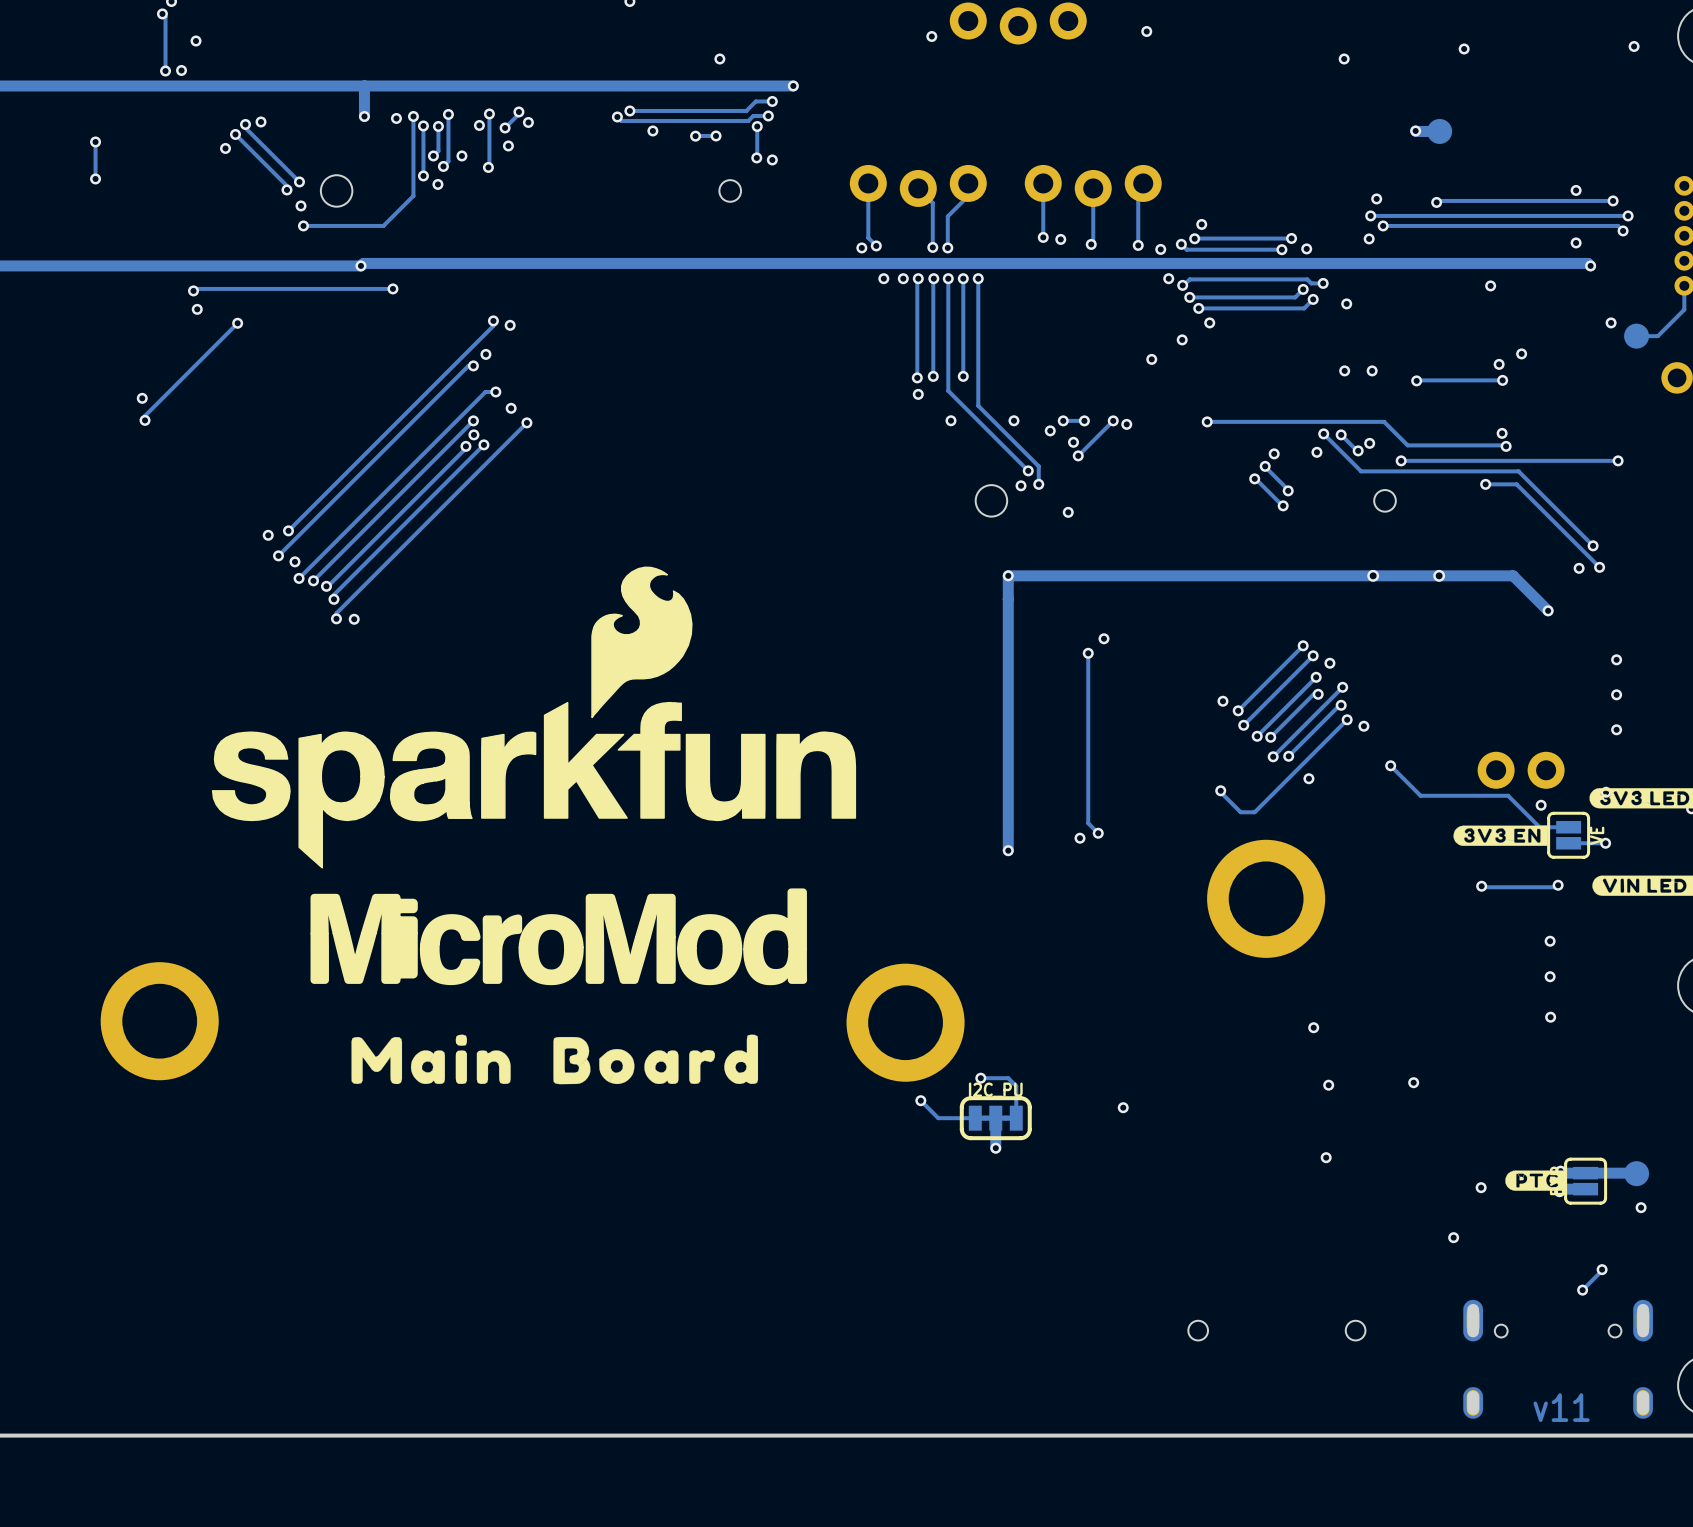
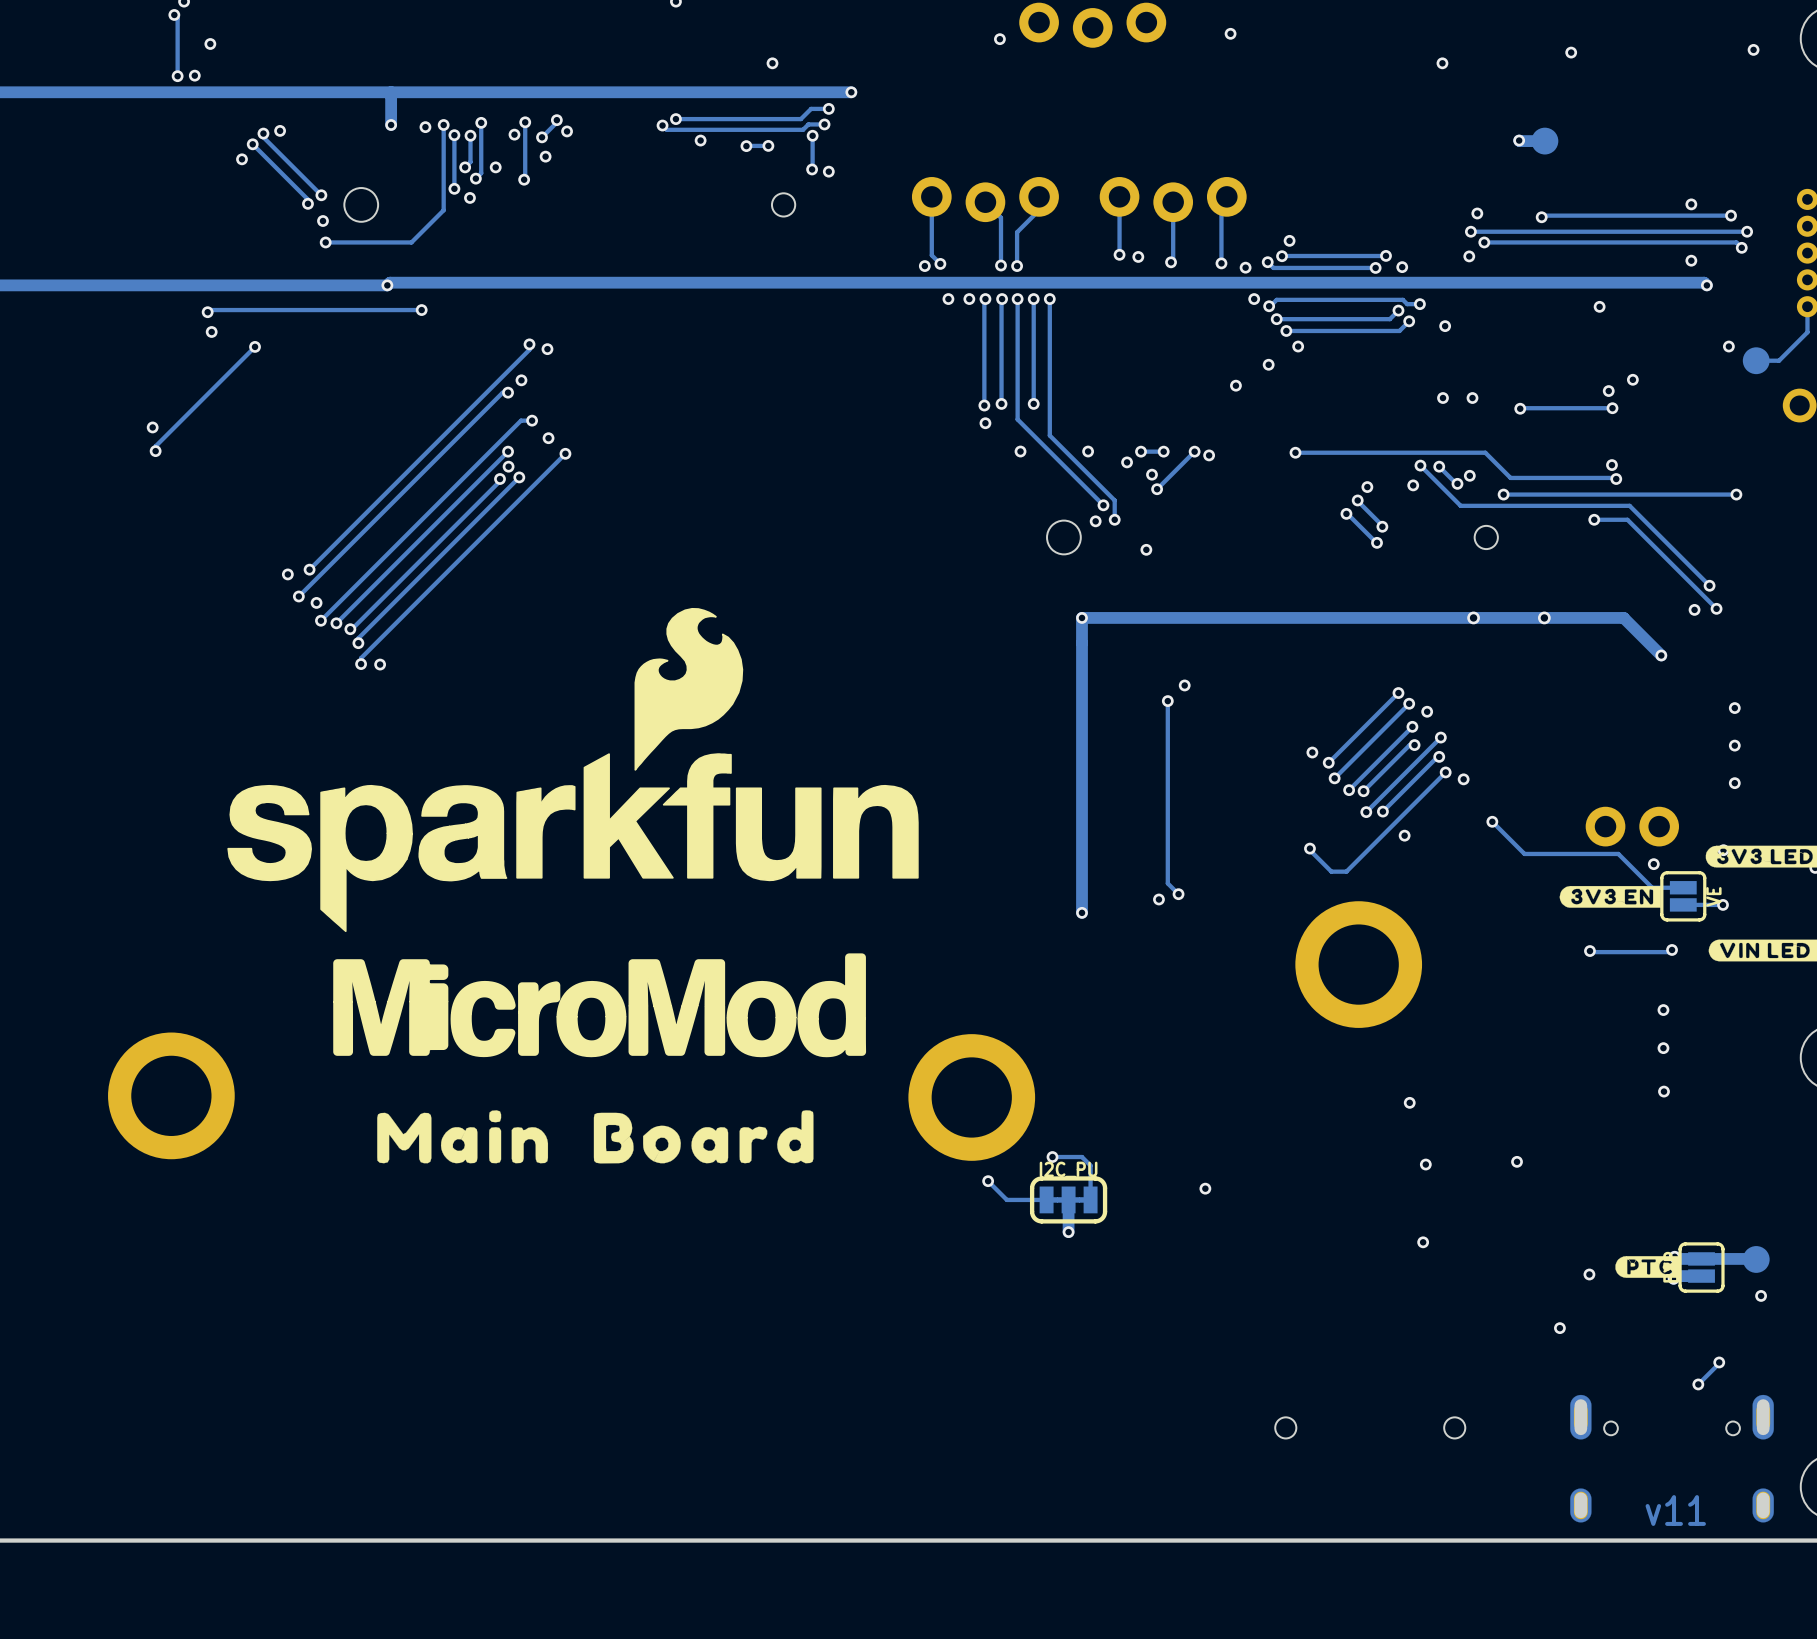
track: (95, 141) (95, 178) -> none
via: (95, 141) -> none
via: (95, 178) -> none

